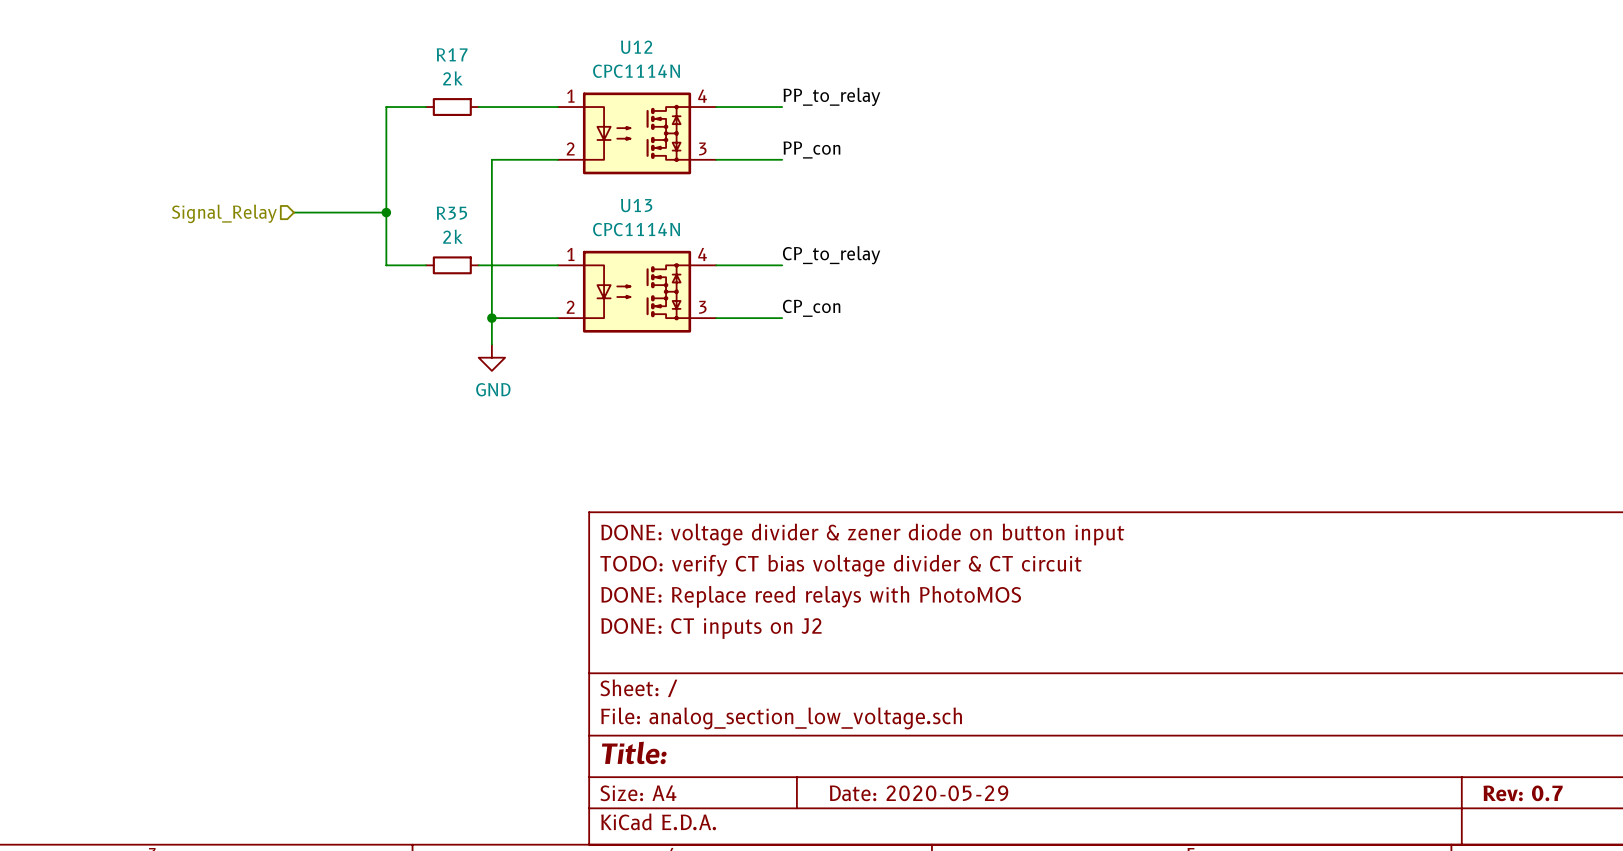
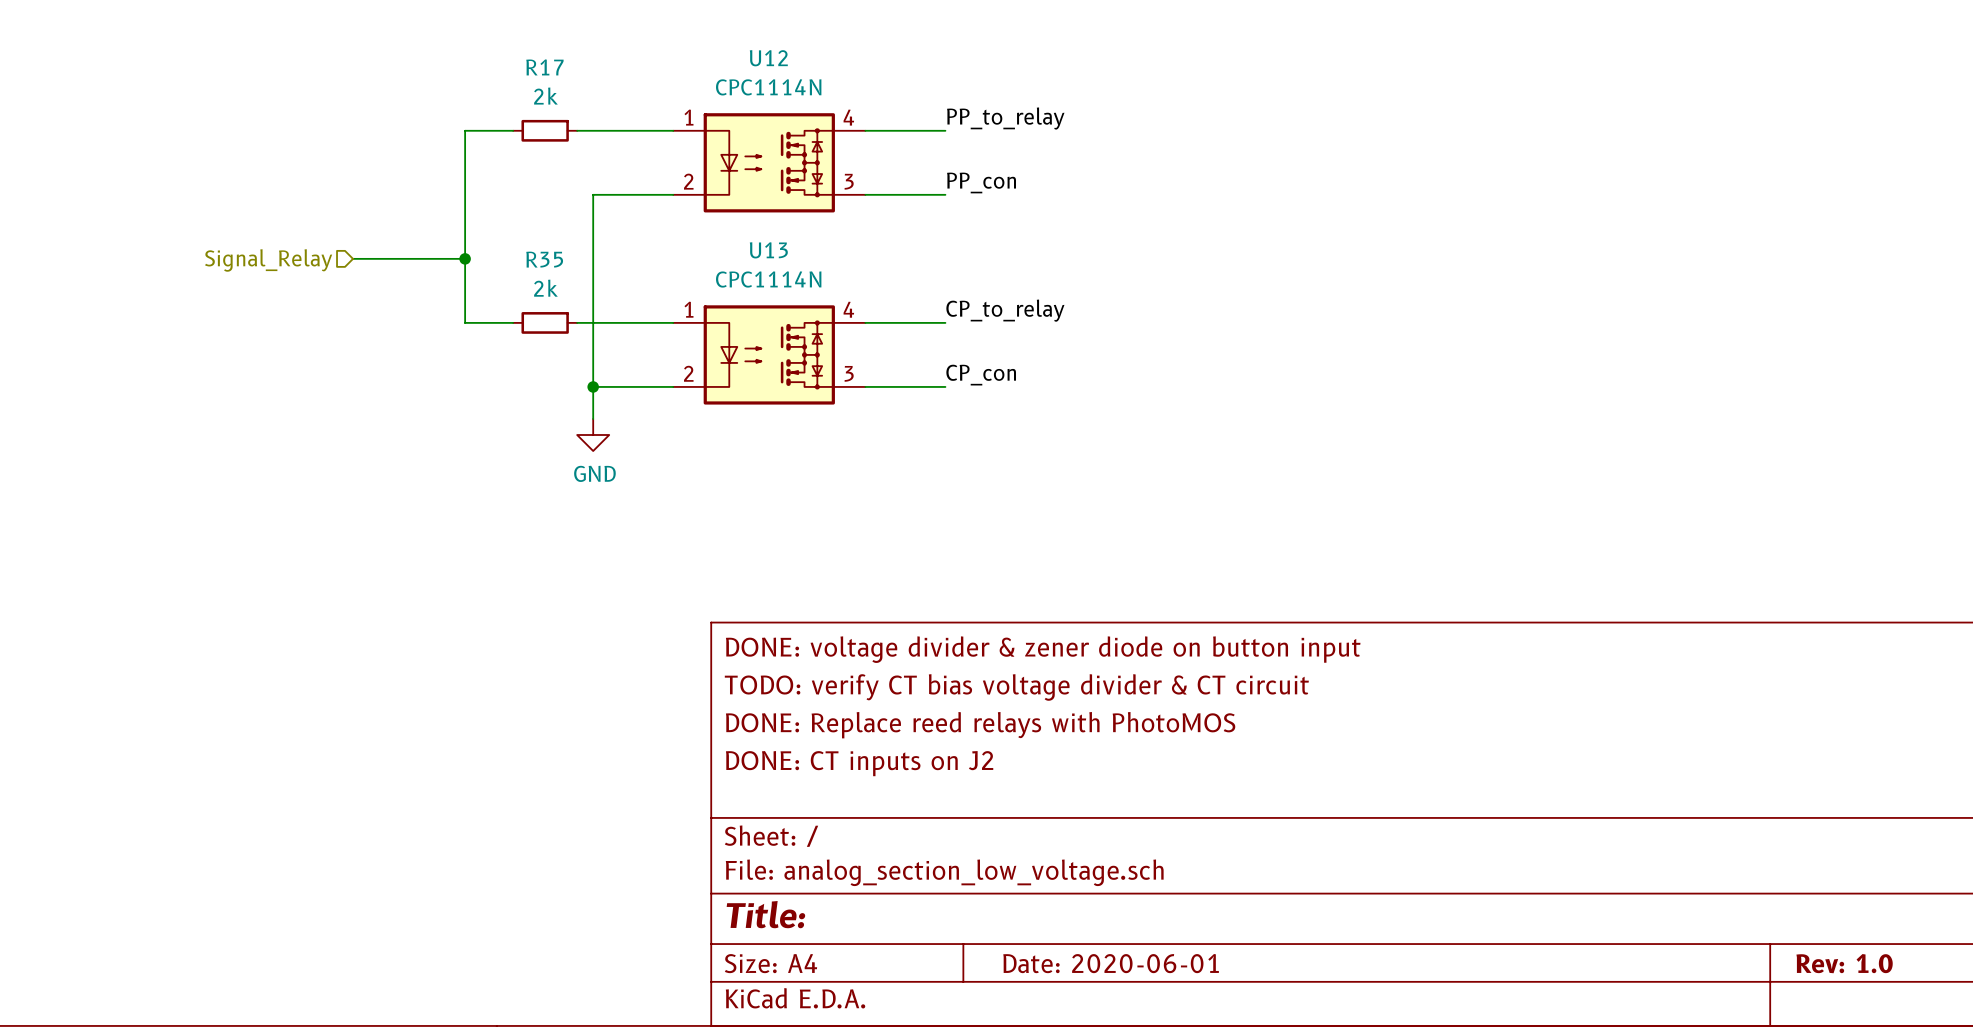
title block: Date: 2020-05-29 (919, 793) -> Date: 2020-06-01 (1111, 963)
title block: Rev: 0.7 (1523, 793) -> Rev: 1.0 (1844, 963)

